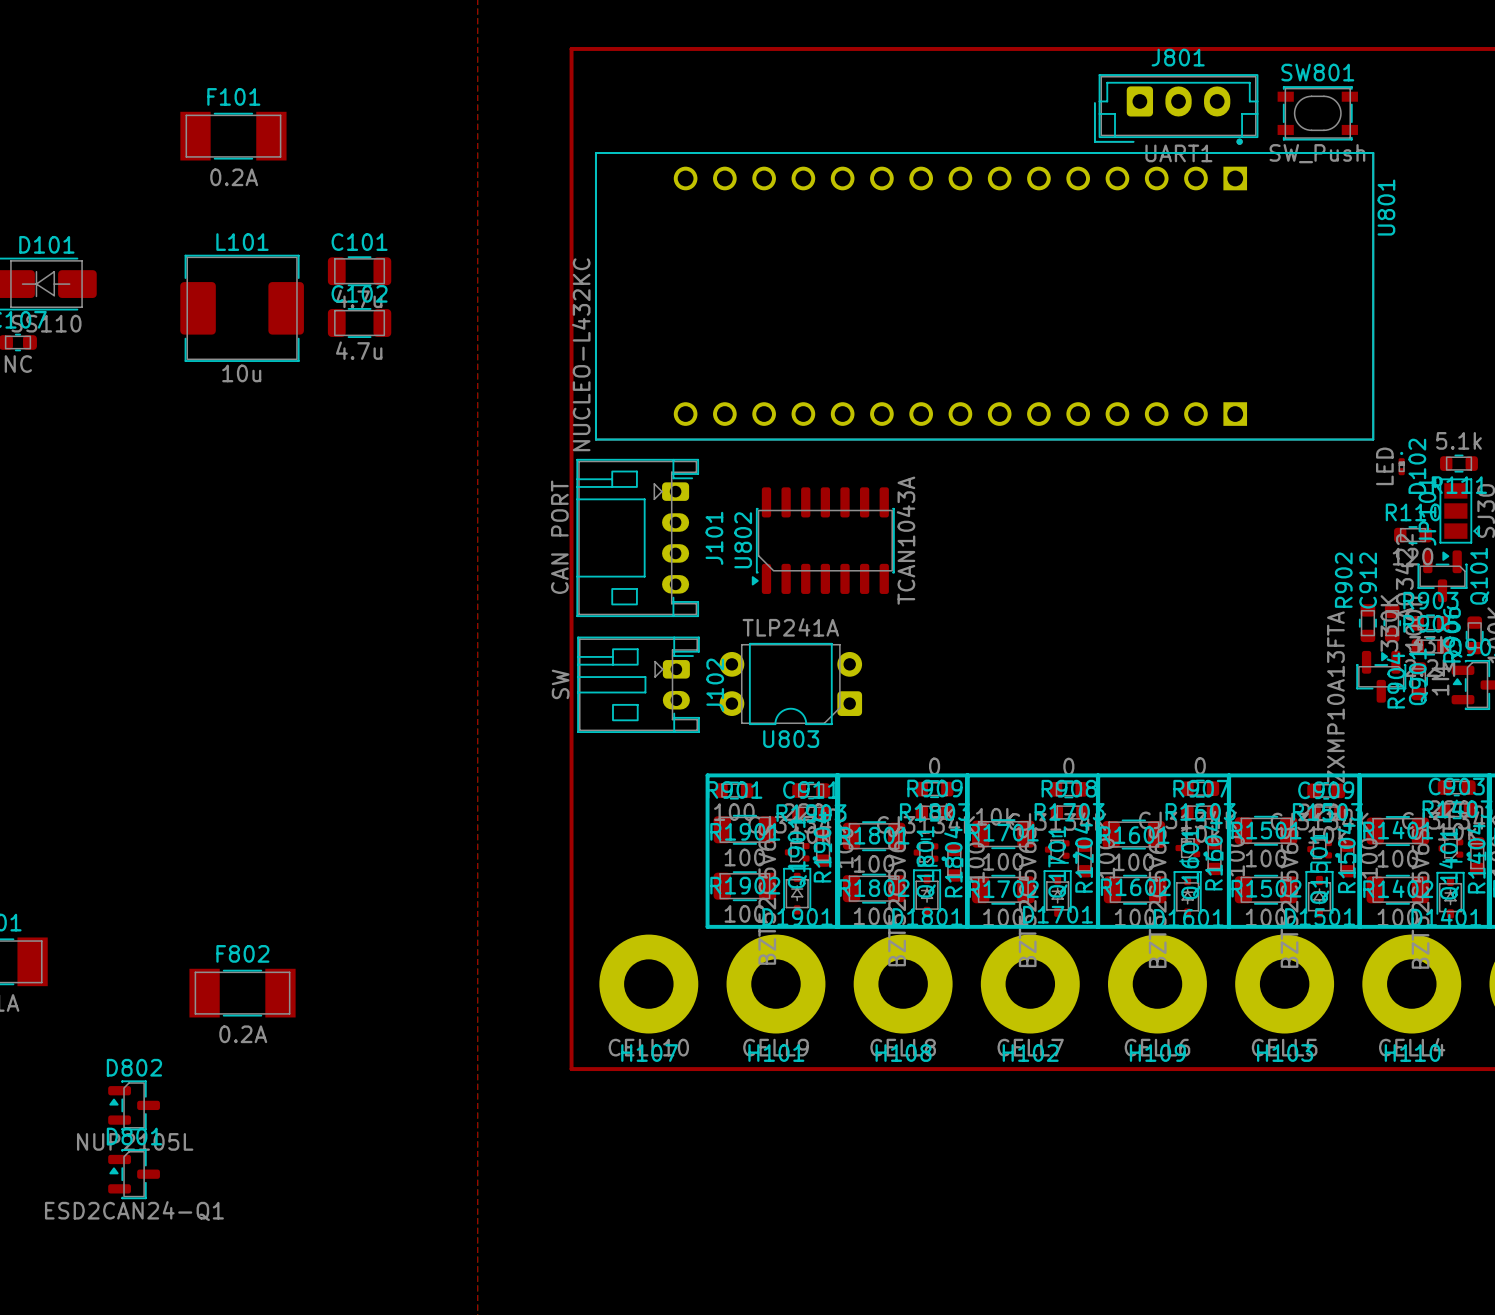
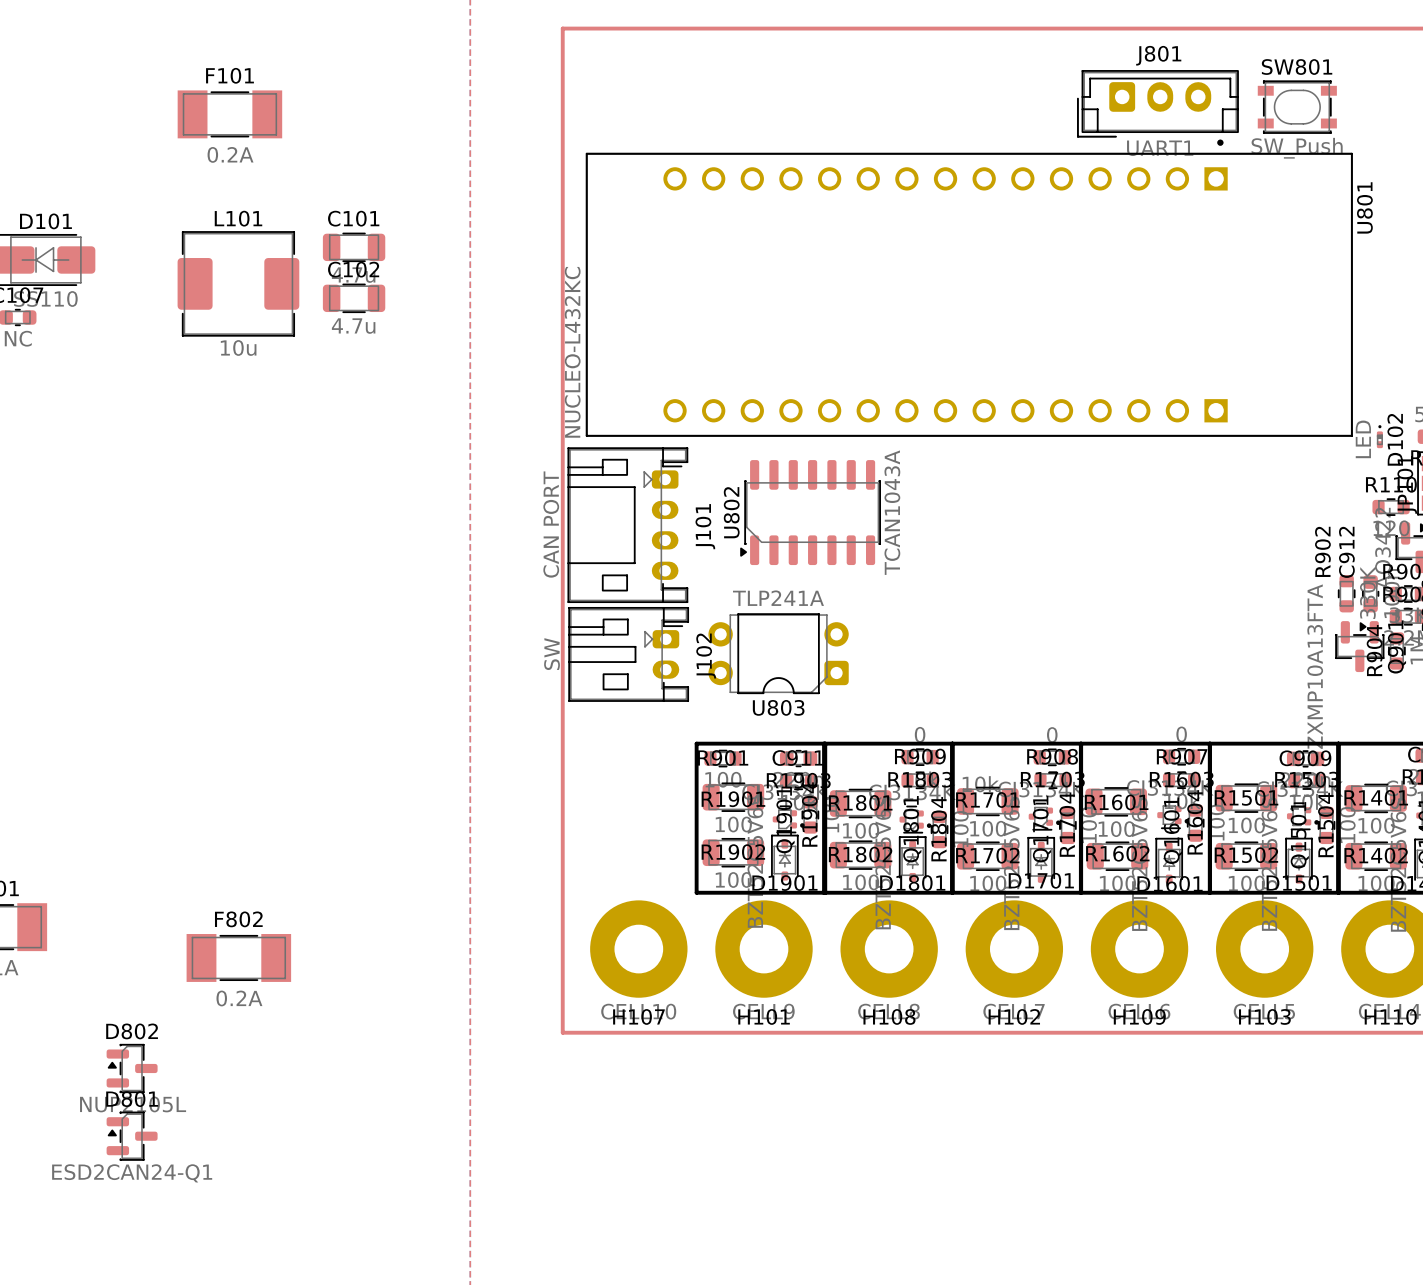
J801 position: (1176, 108) -> (1157, 103)
SW801 position: (1317, 113) -> (1297, 107)
U801 position: (984, 289) -> (969, 288)
J101 position: (637, 537) -> (627, 525)

